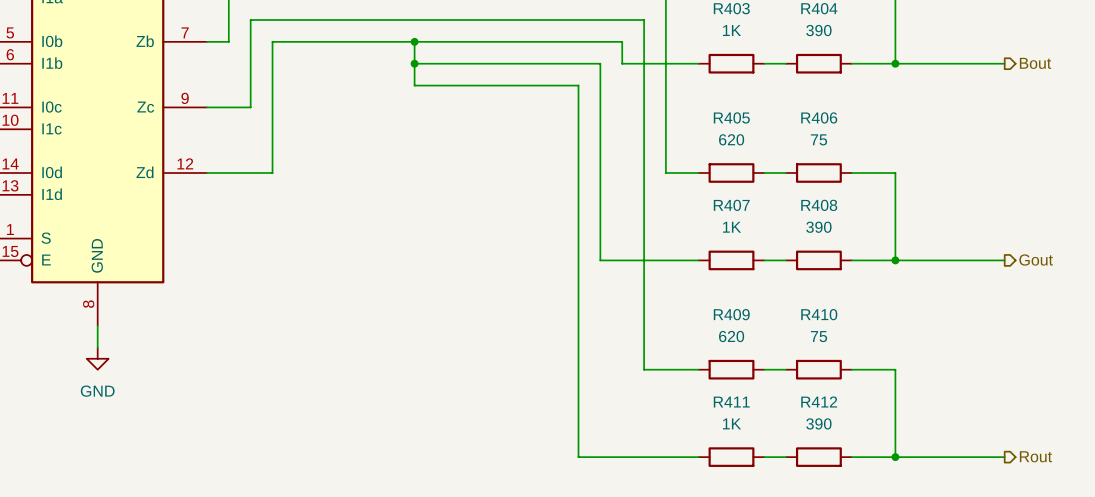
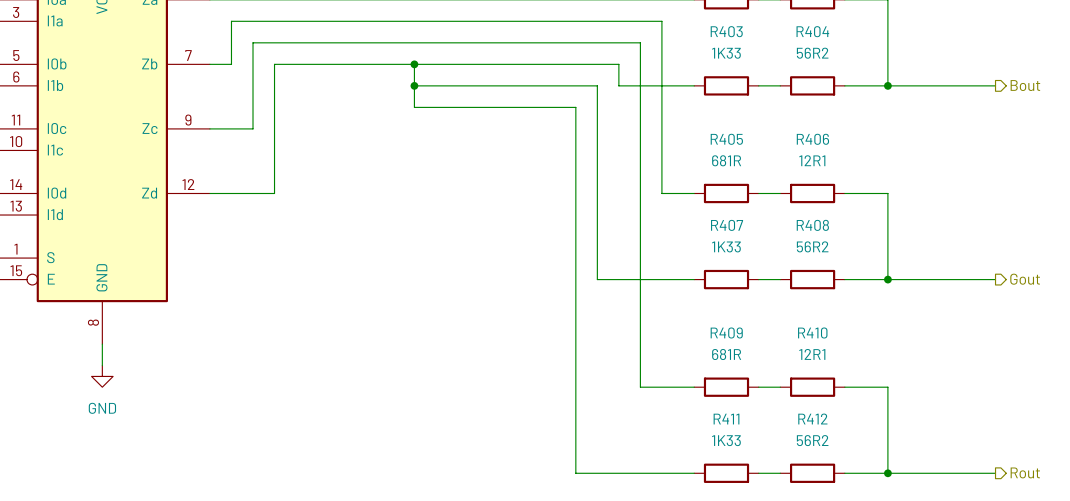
R403 value: 1K (732, 30) -> 1K33 (726, 53)
R404 value: 390 (818, 30) -> 56R2 (812, 53)
R405 value: 620 (731, 139) -> 681R (726, 160)
R406 value: 75 (818, 139) -> 12R1 (812, 160)
R407 value: 1K (732, 227) -> 1K33 (726, 246)
R408 value: 390 (818, 227) -> 56R2 (812, 246)
R409 value: 620 (731, 336) -> 681R (726, 354)
R410 value: 75 (818, 336) -> 12R1 (812, 354)
R411 value: 1K (732, 423) -> 1K33 (726, 440)
R412 value: 390 (818, 423) -> 56R2 (812, 440)

